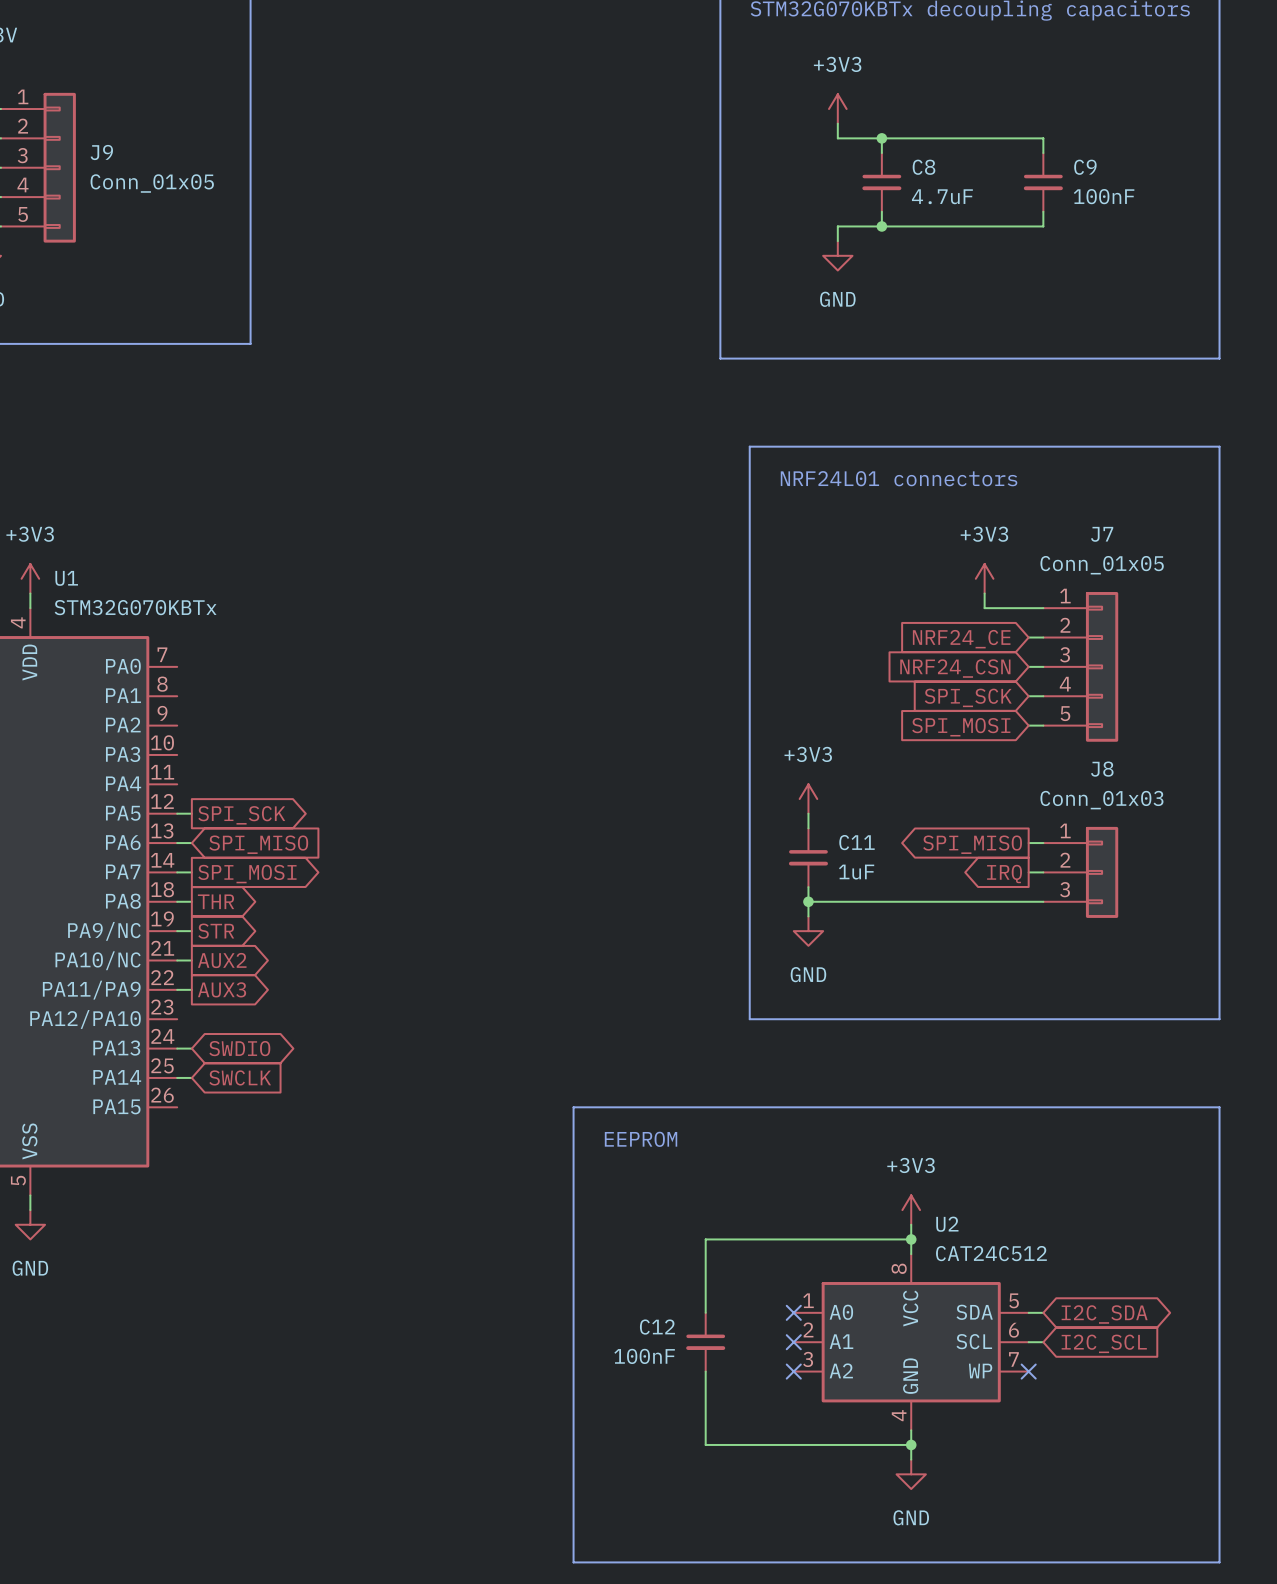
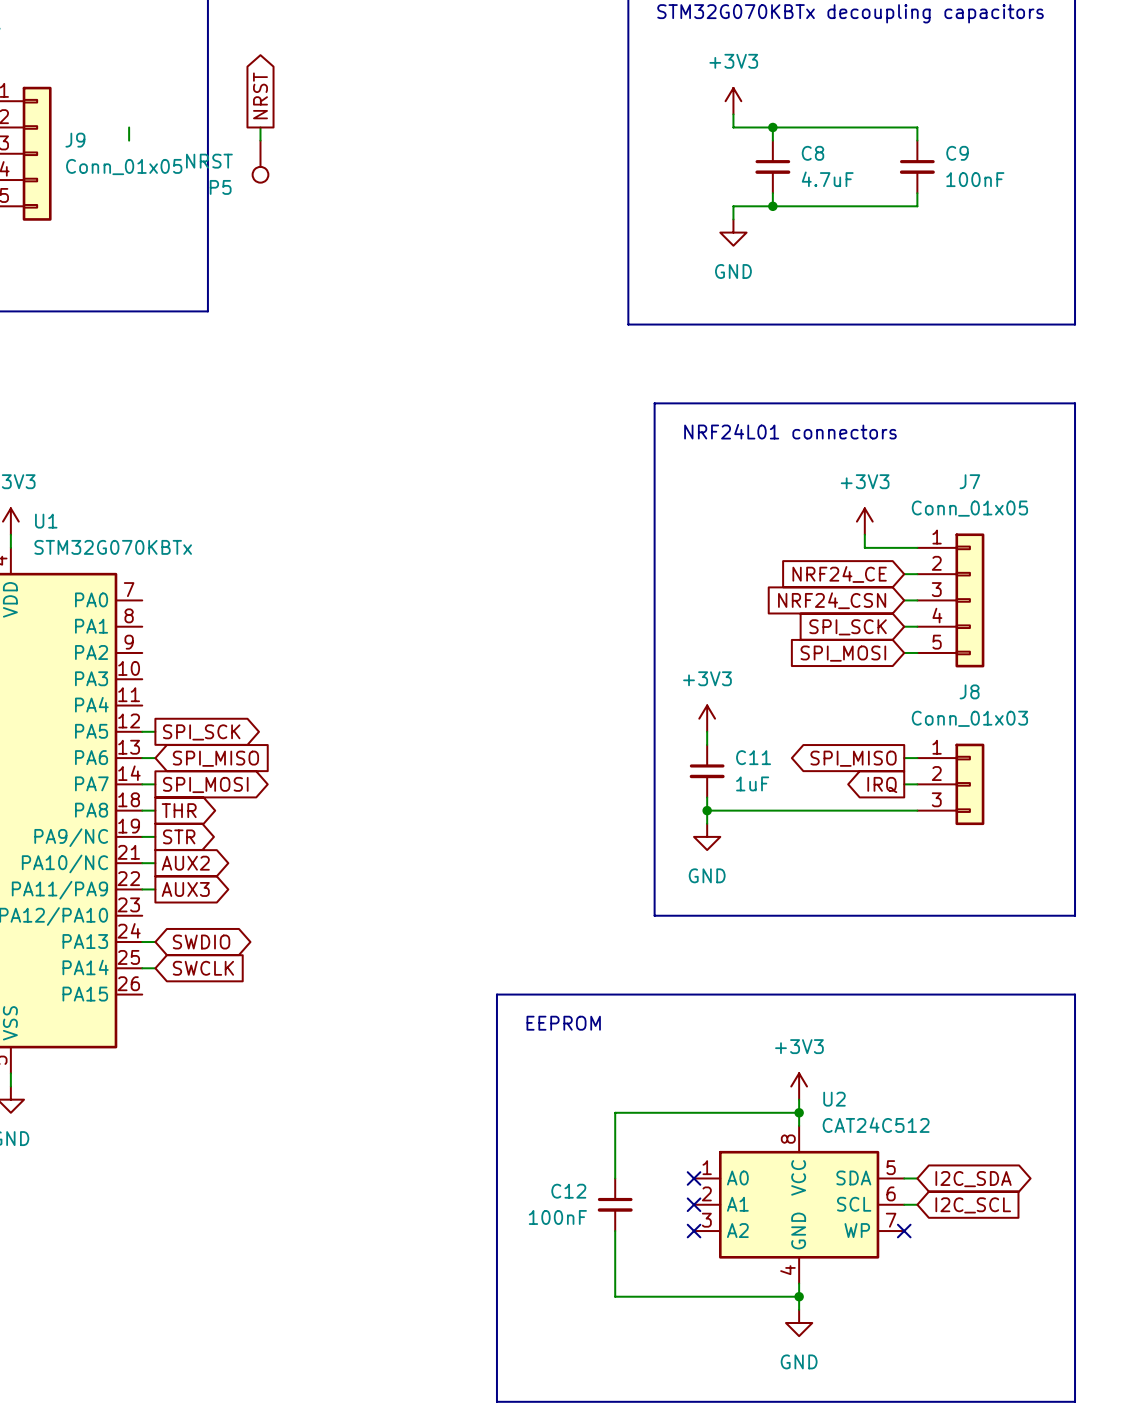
global label: none -> NRST (260, 95)
wire: none -> (129, 127) (129, 140)
wire: none -> (260, 127) (260, 140)
P5: none -> NRST (260, 161)

